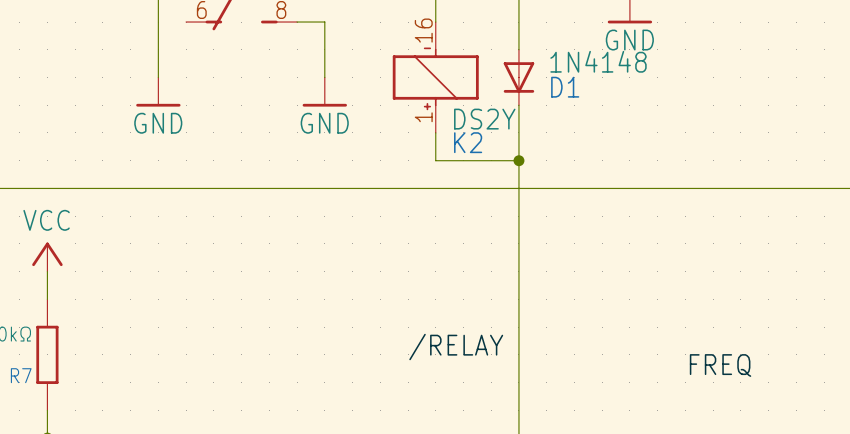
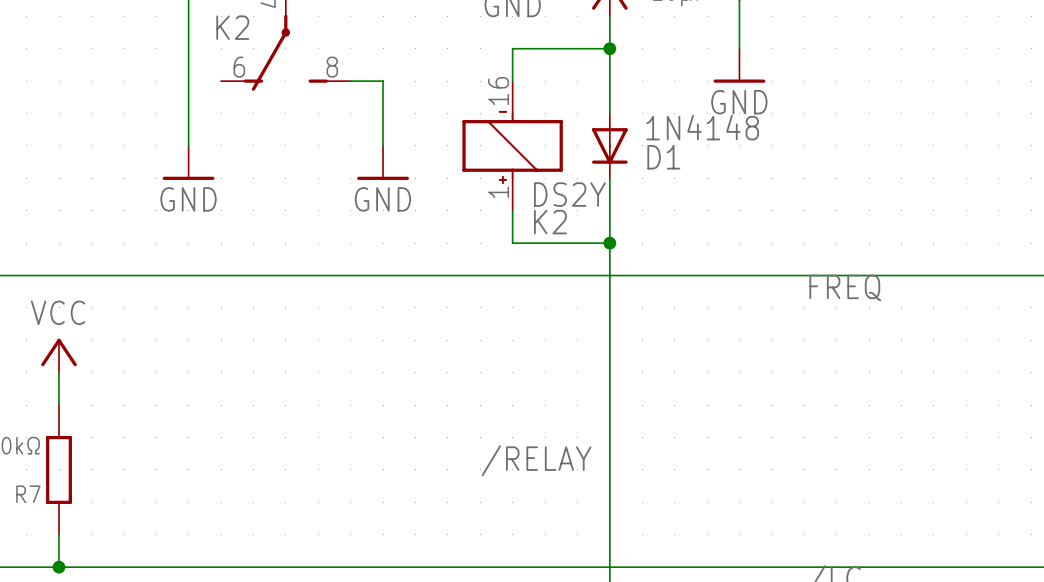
label position: FREQ (720, 365) -> FREQ (845, 287)

